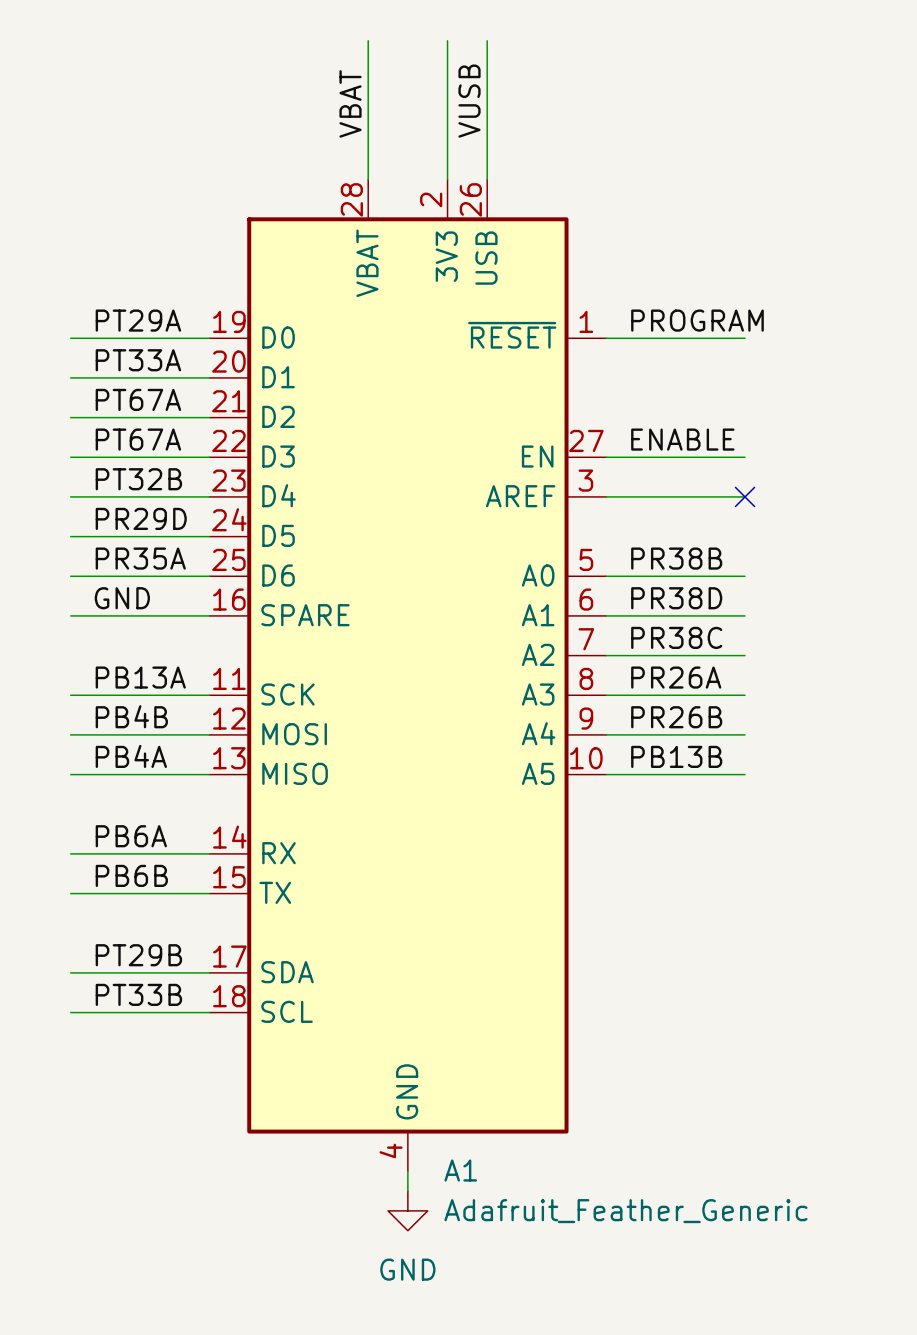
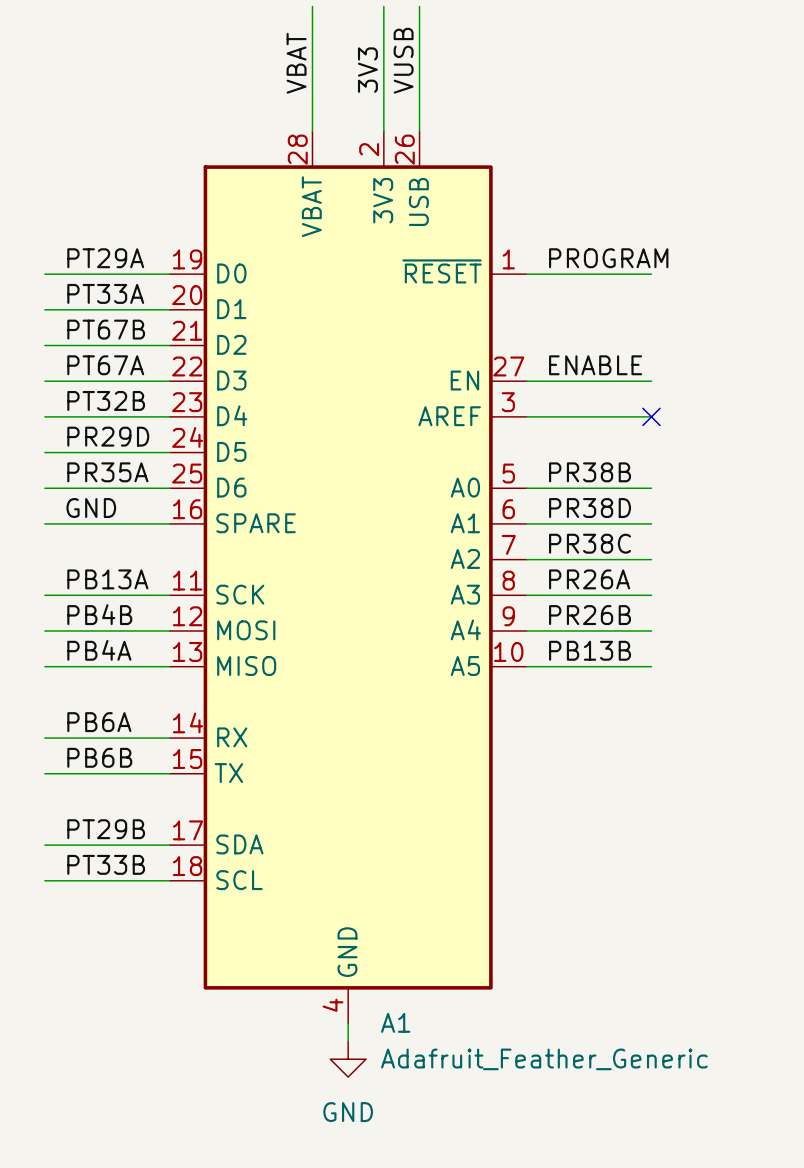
label: none -> 3V3 (367, 70)
label: PT67A (138, 399) -> PT67B (106, 329)

